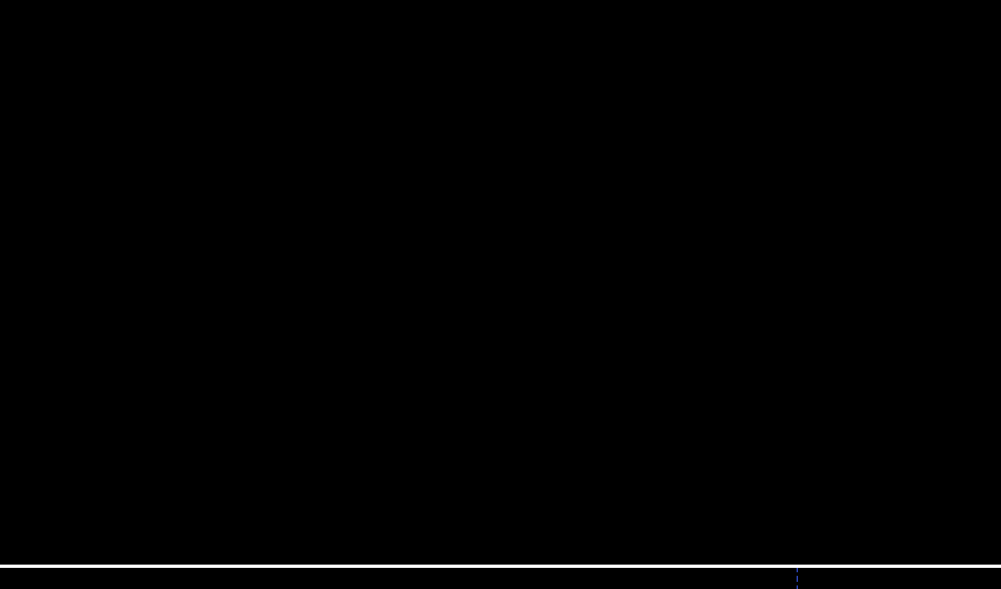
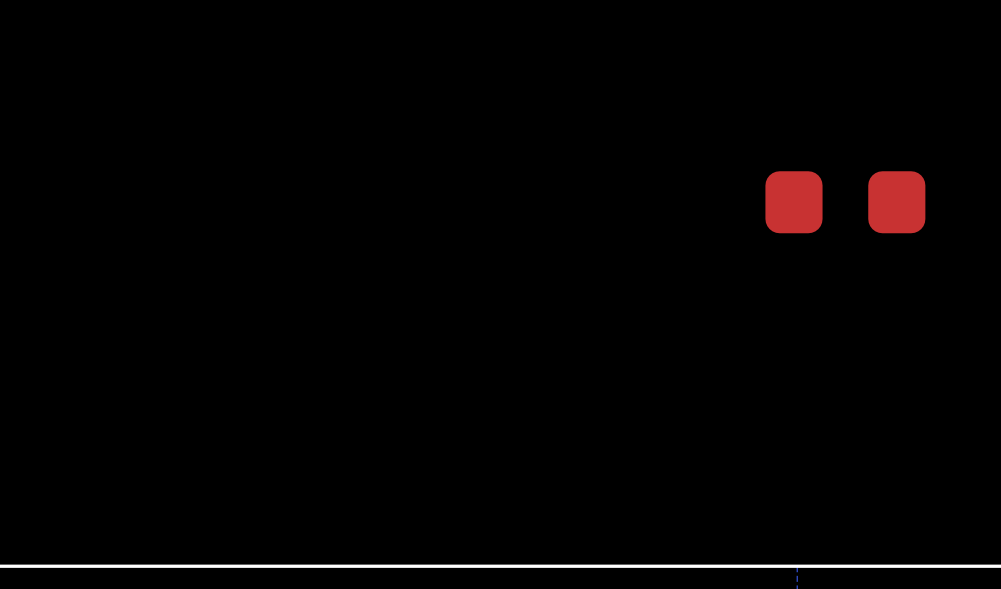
part: none -> (845, 202)

